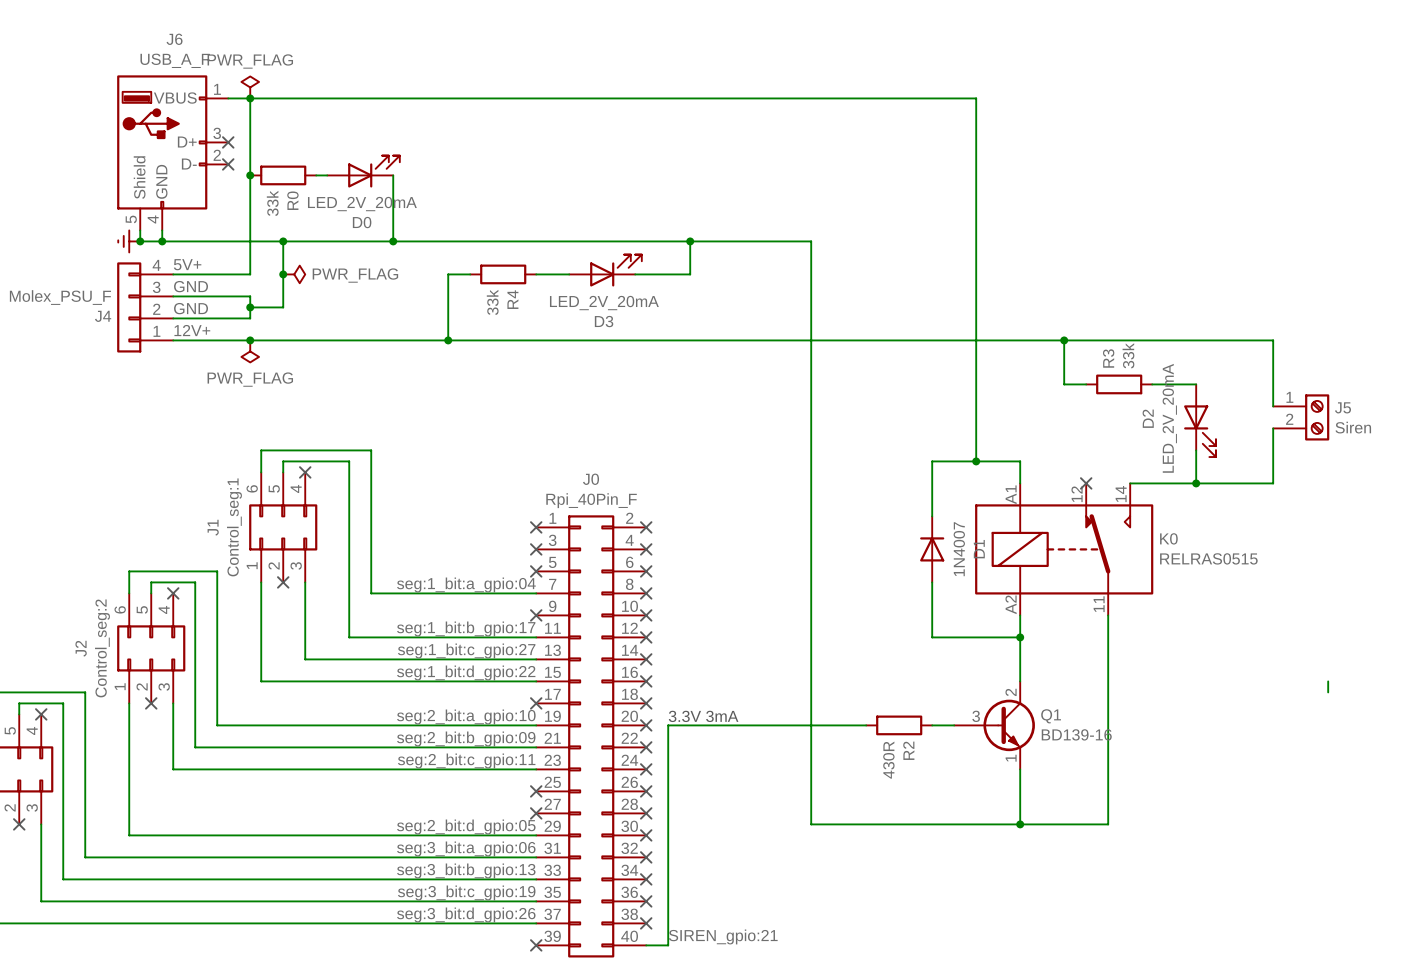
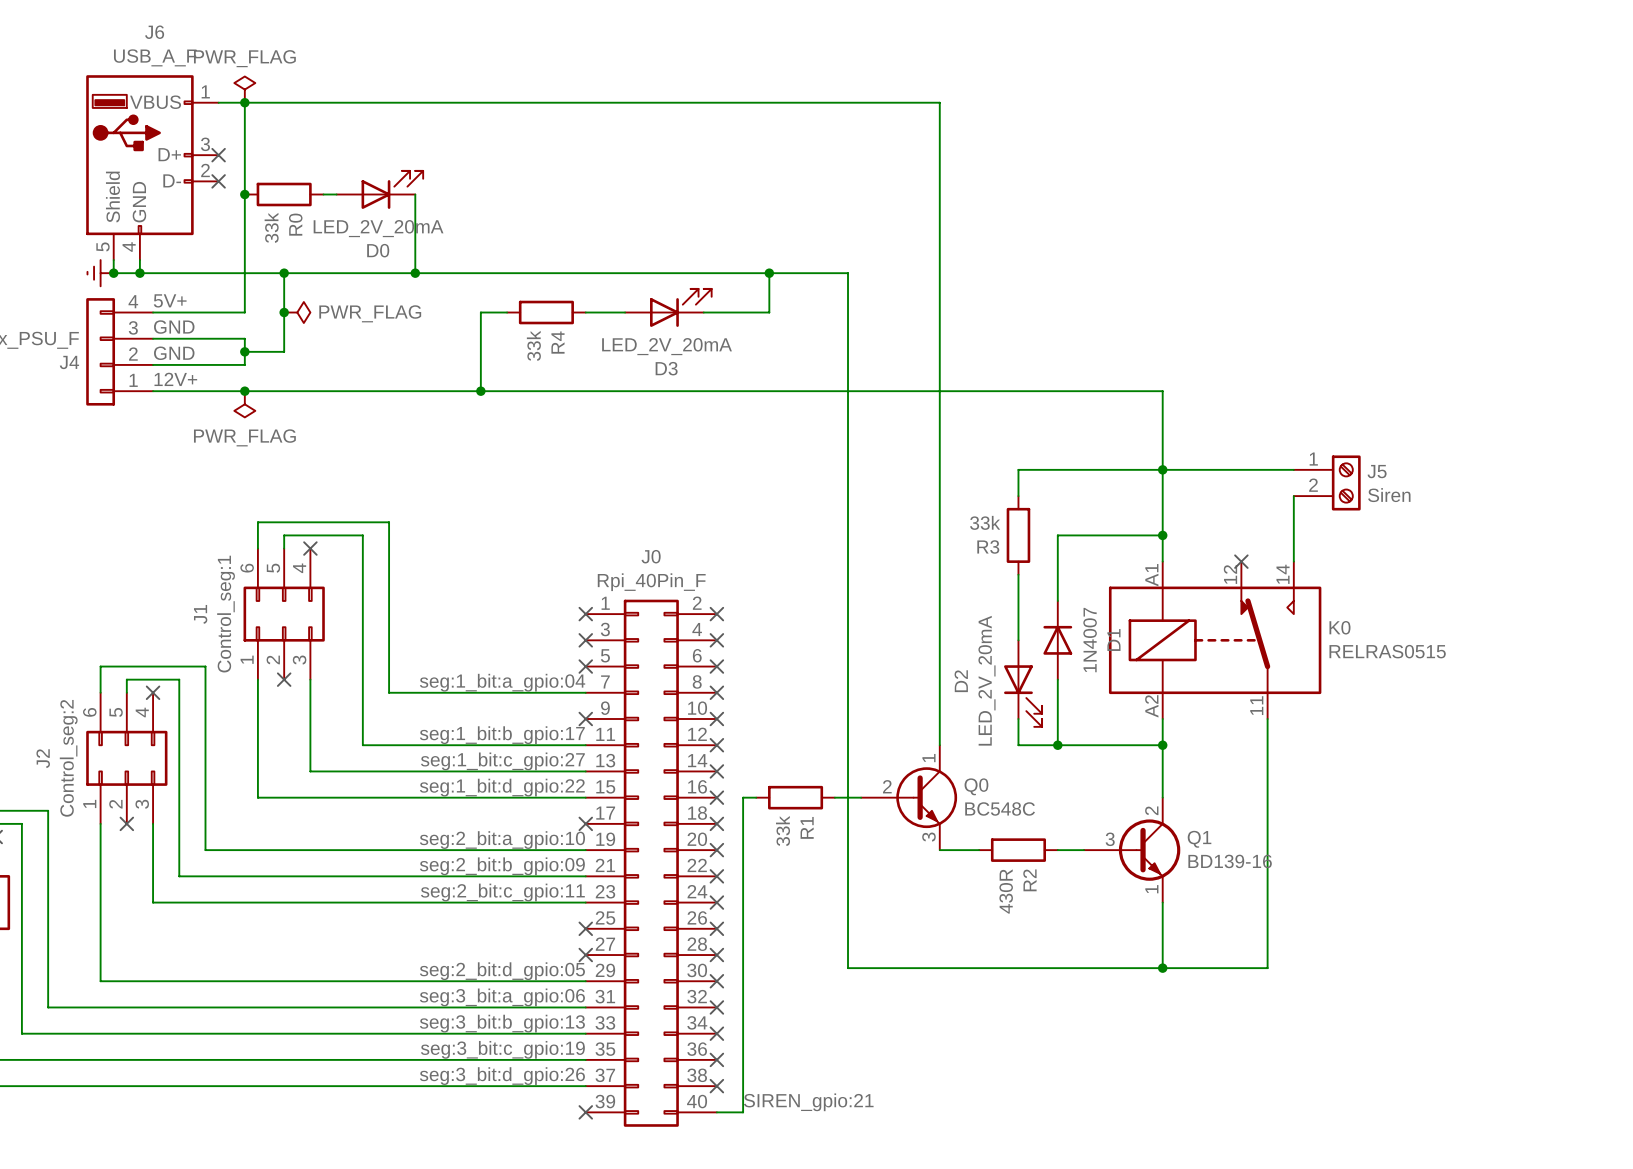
wire: (833, 98) (976, 98) (976, 461) -> (939, 102) (939, 745)
wire: (756, 241) (811, 241) (811, 824) -> (848, 273) (848, 968) (913, 968)
wire: (1020, 340) (1273, 340) (1273, 406) -> (1162, 391) (1162, 535)
wire: (1064, 340) (1064, 384) (1086, 384) -> none
junction: (1064, 340) -> none
R3 value position: 33k (1128, 355) -> 33k (985, 522)
R3 name position: R3 (1108, 358) -> R3 (988, 546)
R3 rotation: 0° (1119, 384) -> 90° clockwise (1018, 535)
R3 position: (1119, 384) -> (1018, 535)
wire: (1152, 384) (1196, 384) -> none
junction: none -> (1162, 469)
wire: none -> (1293, 469) (1018, 469) (1018, 496)
J5 position: (1301, 417) -> (1327, 482)
D2 position: (1200, 420) -> (1023, 683)
wire: (1273, 428) (1273, 483) (1130, 483) -> (1293, 496) (1293, 561)
wire: (1196, 450) (1196, 483) -> none
junction: (976, 461) -> none
junction: none -> (1162, 535)
junction: (1196, 483) -> none
wire: none -> (1018, 574) (1018, 640)
wire: none -> (1018, 719) (1018, 745) (1057, 745)
junction: none -> (1057, 745)
R1: none -> 33k (795, 797)
wire: none -> (834, 797) (861, 797)
Q0: none -> BC548C (909, 797)
wire: (1328, 681) (1328, 692) -> none
text: 3.3V 3mA (703, 716) -> none
wire: (668, 725) (833, 725) -> (743, 850) (743, 797) (756, 797)

